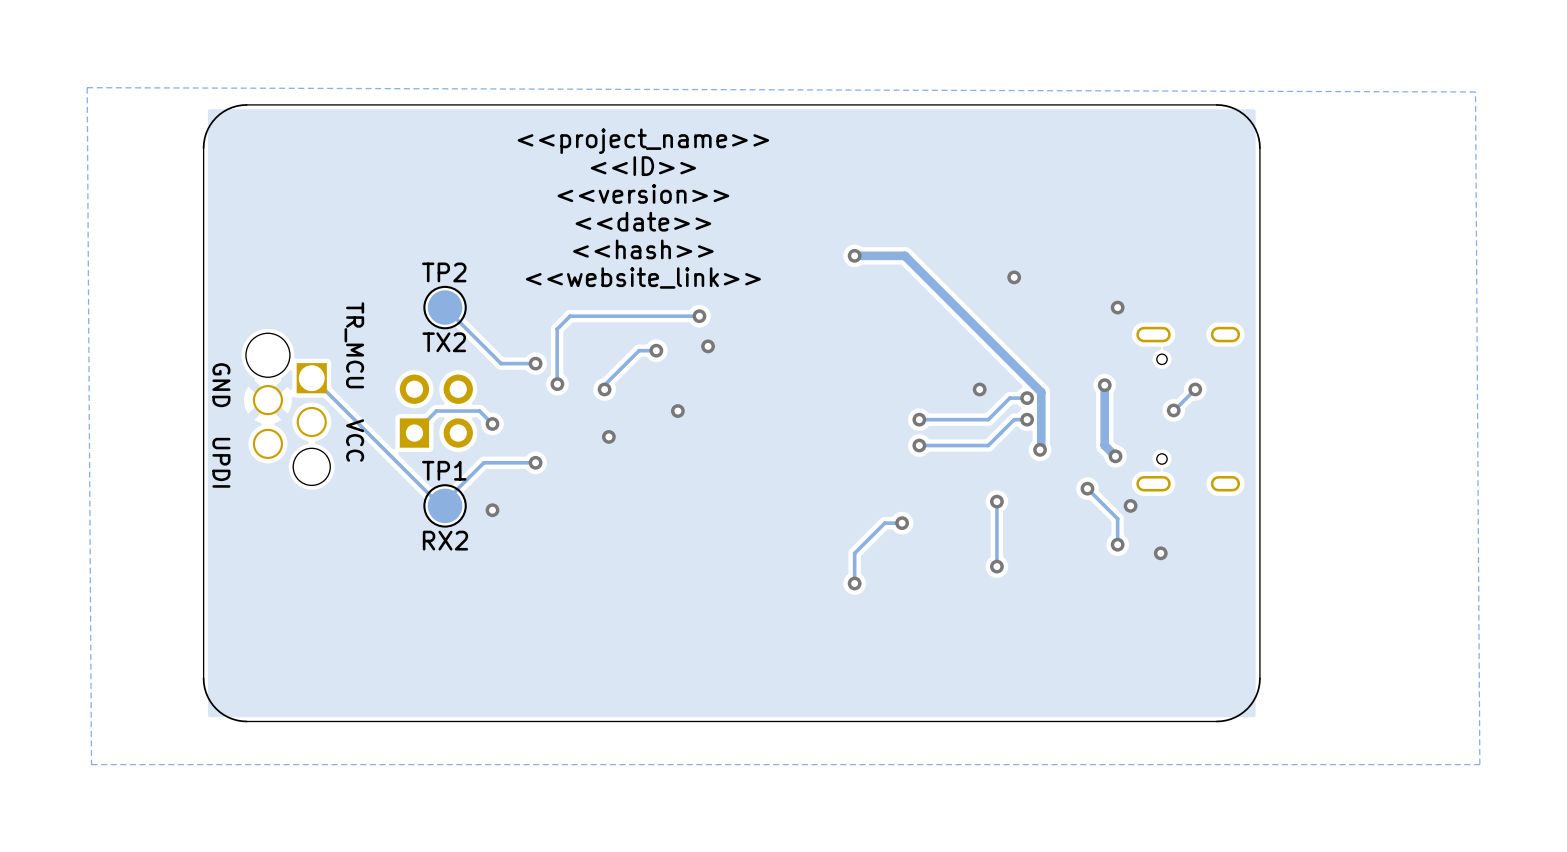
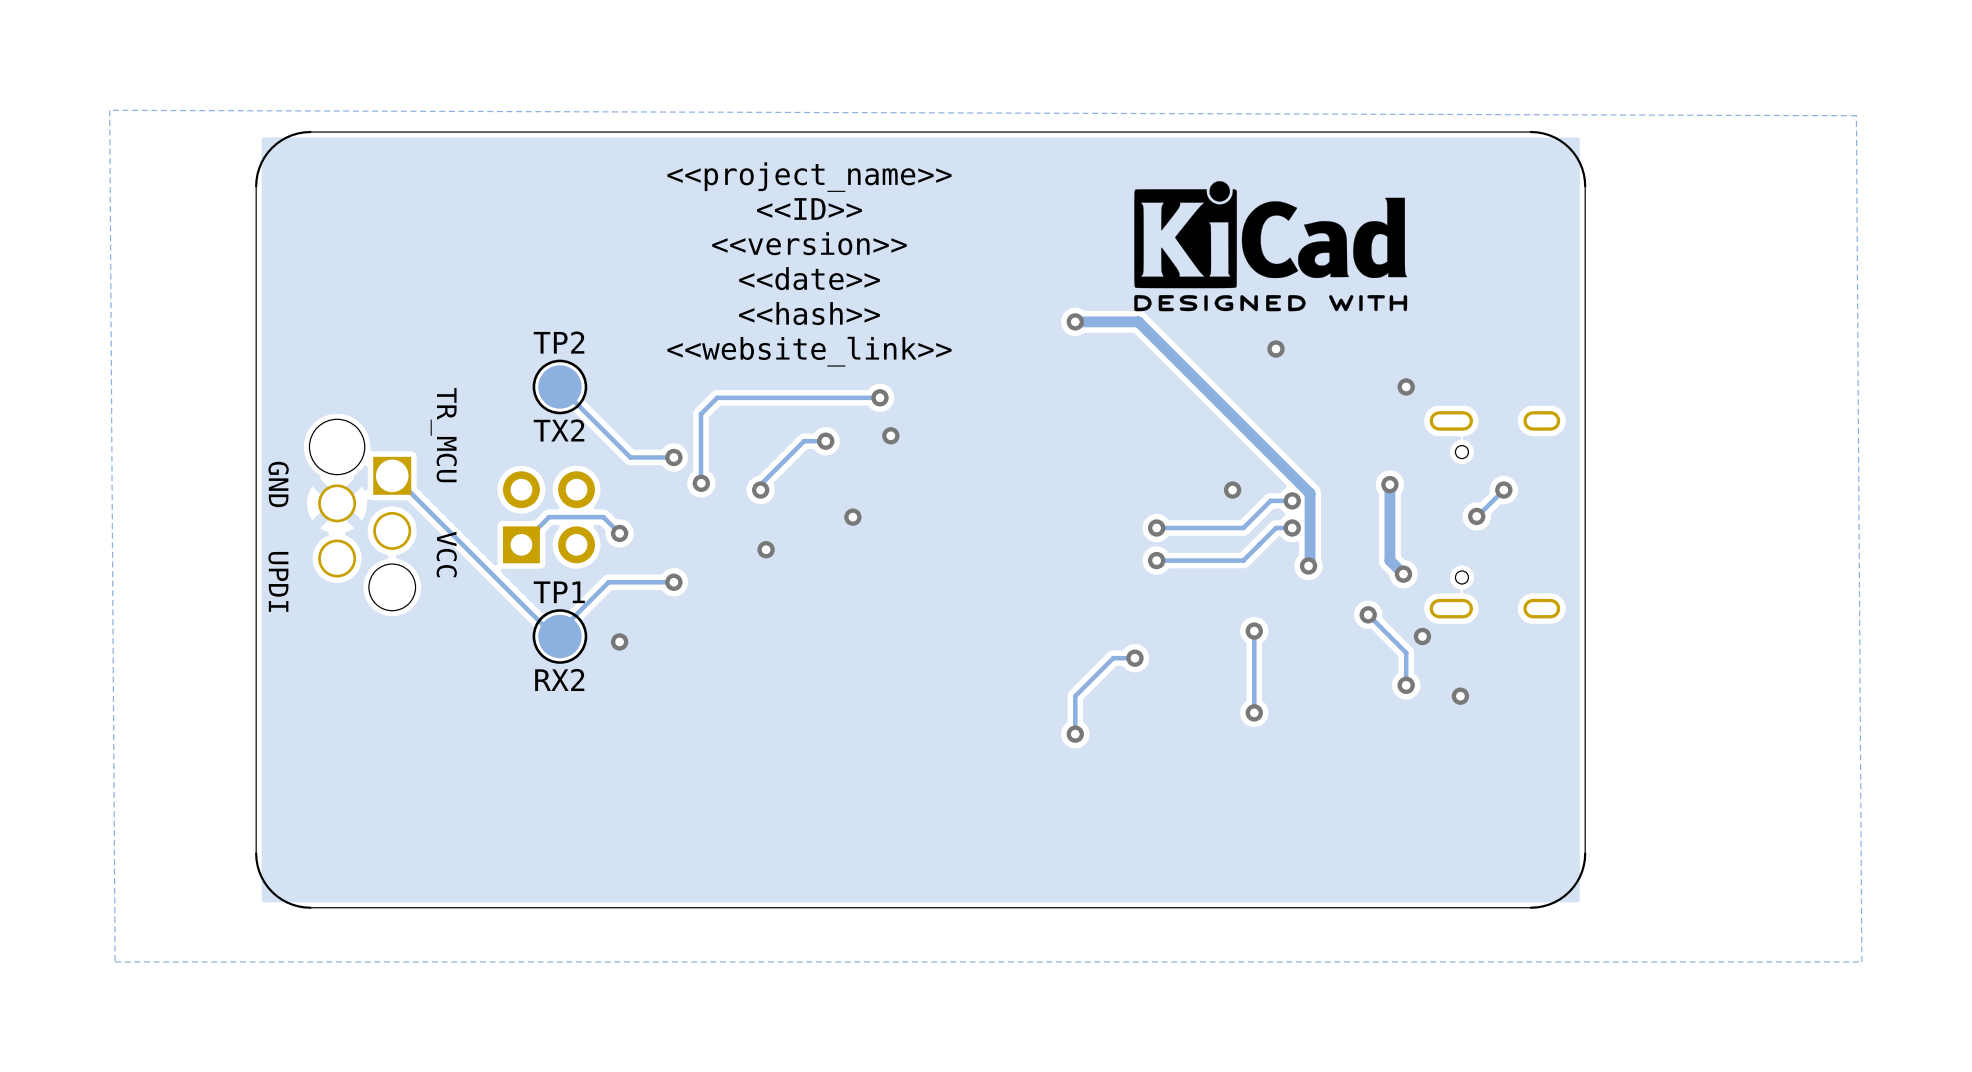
drawing: none -> [1134, 181, 1408, 312]

